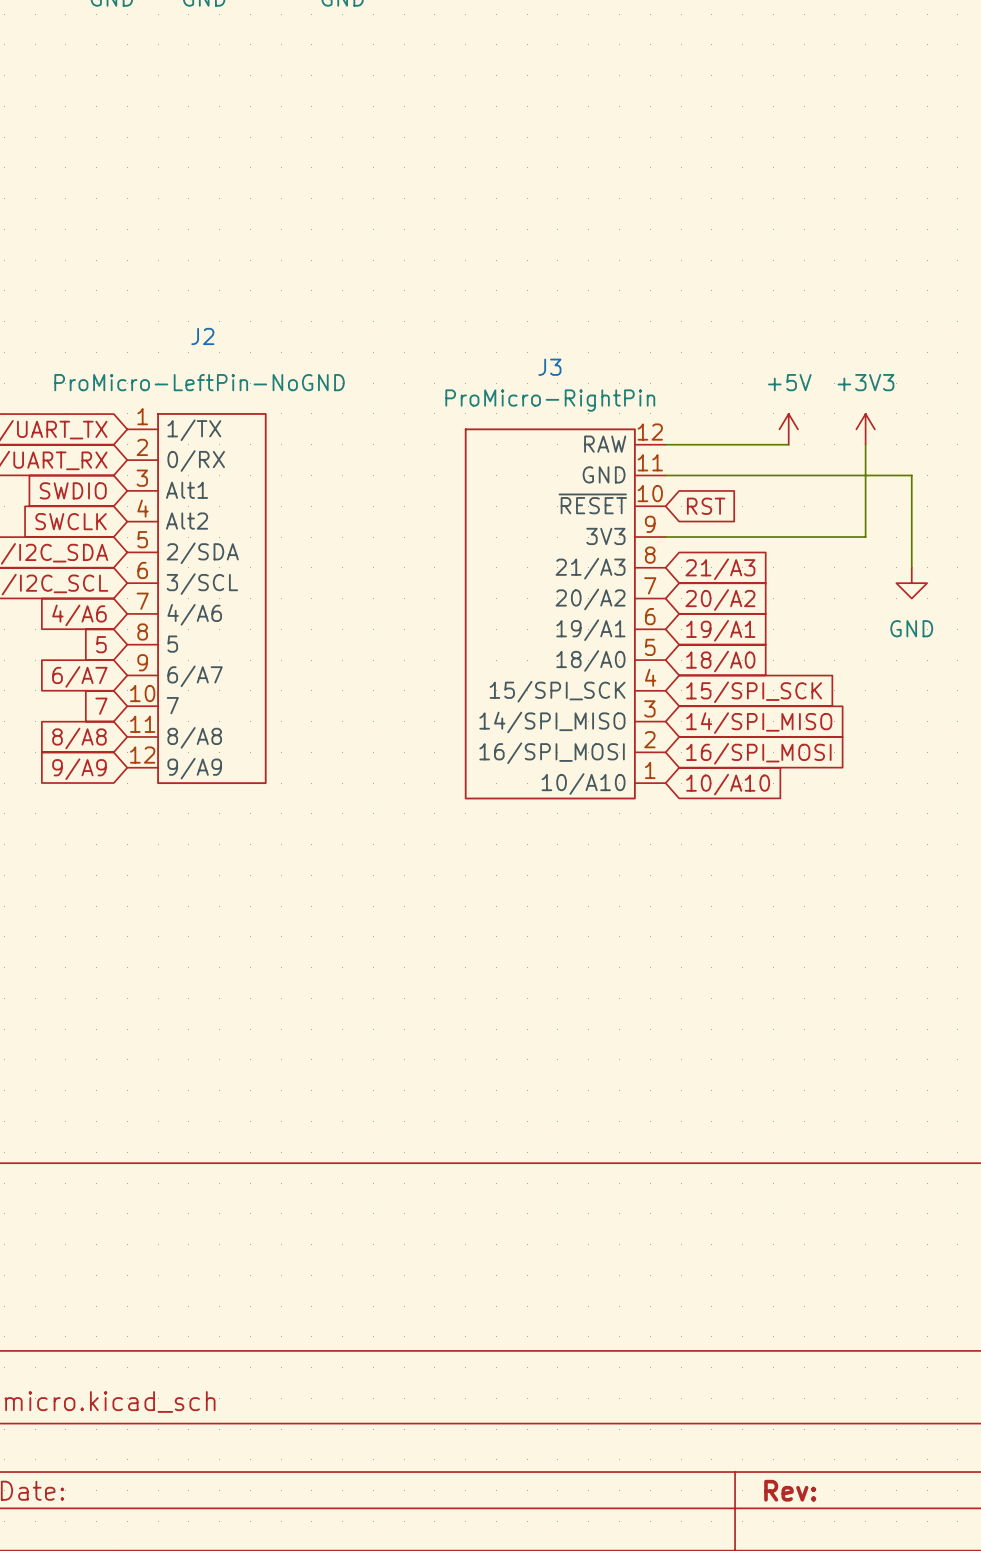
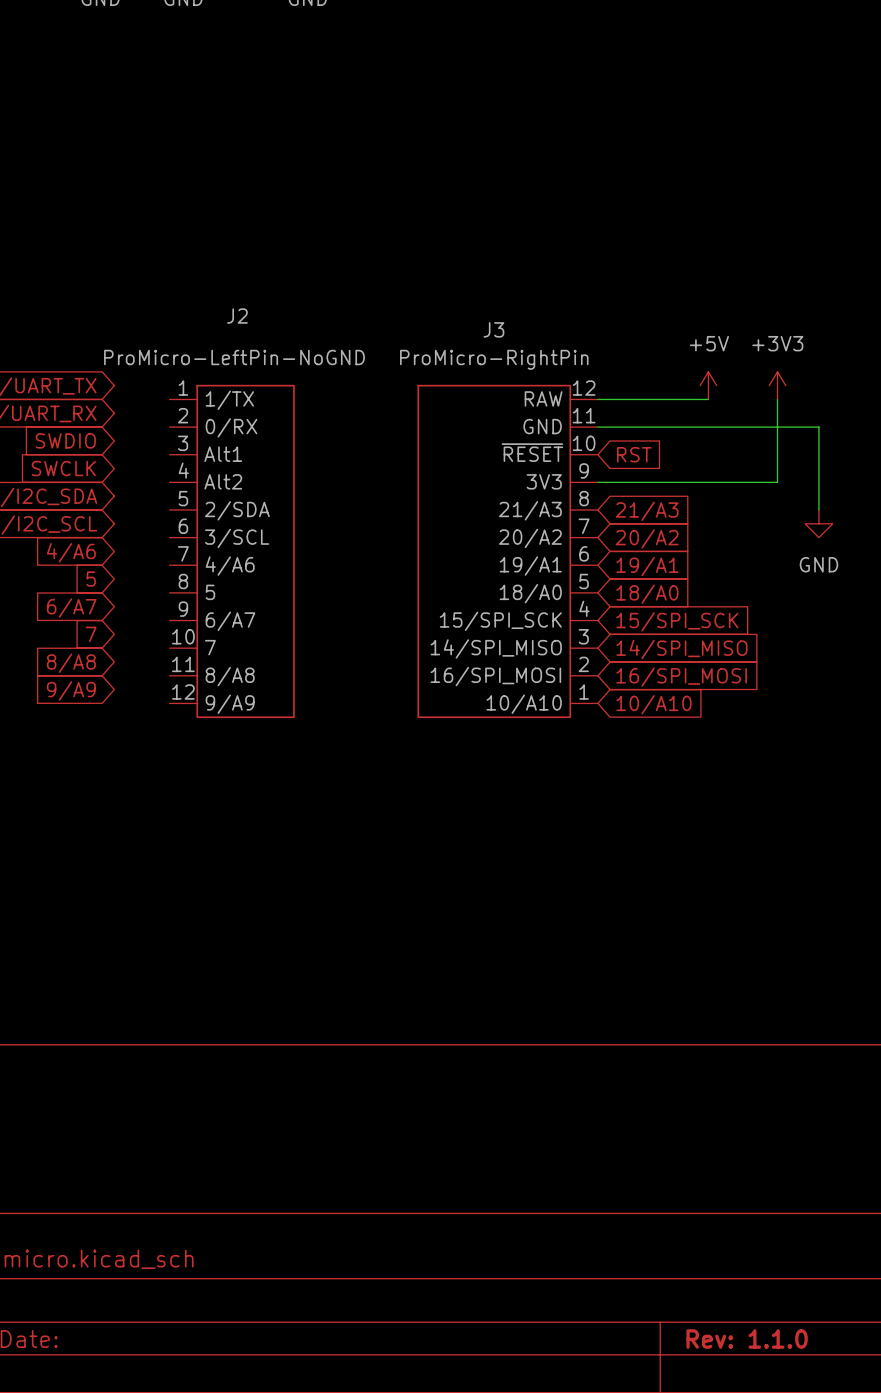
J2 position: (196, 598) -> (232, 551)
title block: Rev: (790, 1490) -> Rev: 1.1.0 (747, 1339)

